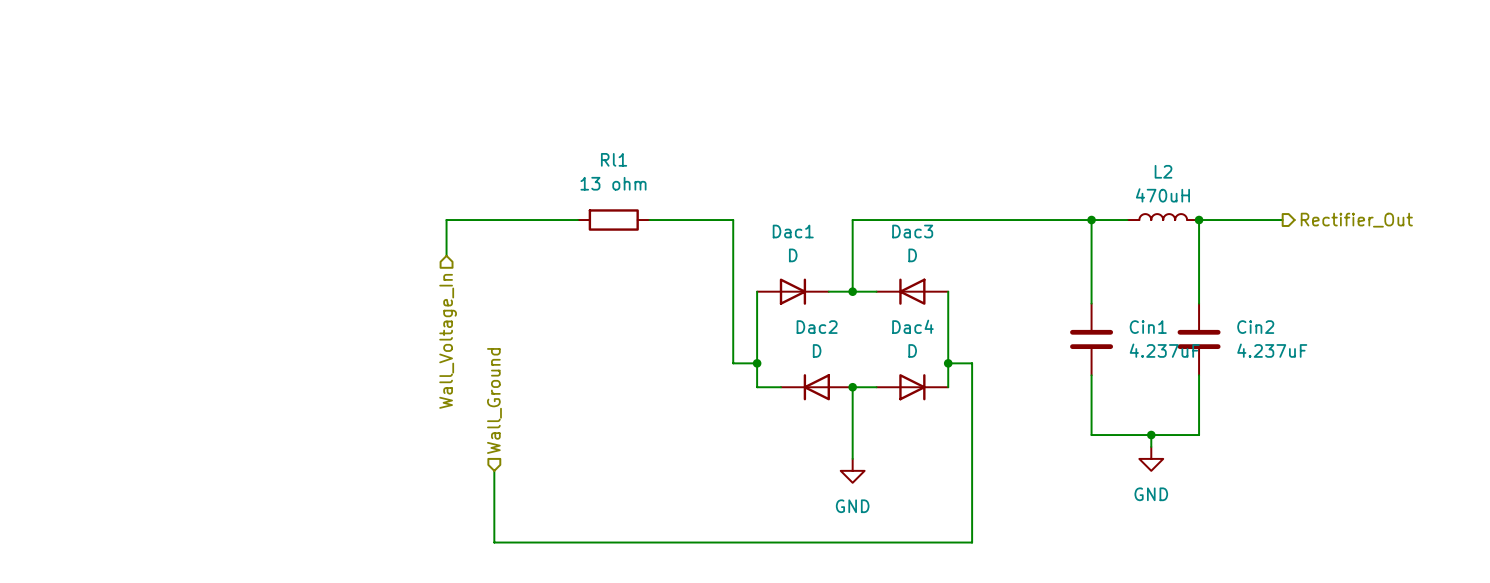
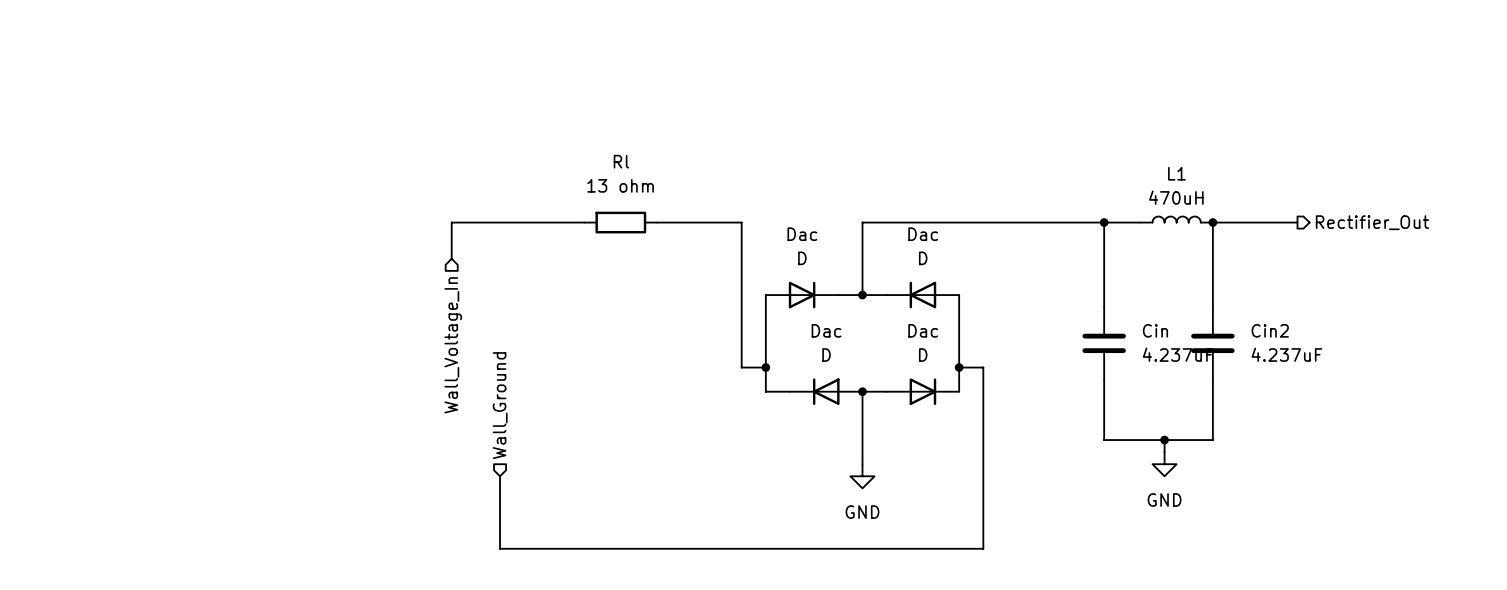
Rl1 name: Rl1 (614, 159) -> Rl (621, 161)
L2 name: L2 (1163, 171) -> L1 (1176, 173)
Dac1 name: Dac1 (793, 231) -> Dac (802, 234)
Dac3 name: Dac3 (912, 231) -> Dac (923, 234)
Dac4 name: Dac4 (912, 326) -> Dac (923, 330)
Dac2 name: Dac2 (817, 327) -> Dac (826, 330)
Cin1 name: Cin1 (1148, 327) -> Cin (1155, 330)

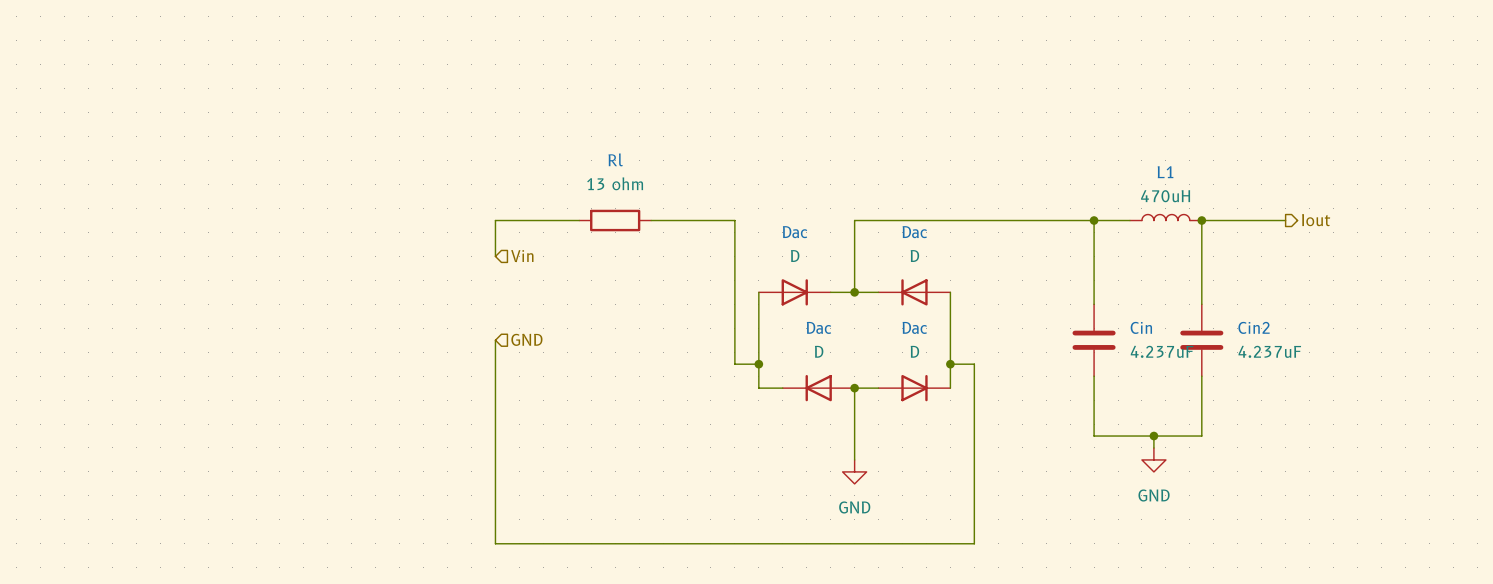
wire: (500, 222) (451, 222) (451, 258) -> (495, 220) (495, 256)
hierarchical label: Rectifier_Out (1372, 222) -> Iout (1316, 220)
hierarchical label: none -> Vin (522, 256)
hierarchical label: none -> GND (526, 339)
wire: none -> (495, 340) (495, 471)
hierarchical label: Wall_Voltage_In (453, 345) -> none
hierarchical label: Wall_Ground (500, 405) -> none

